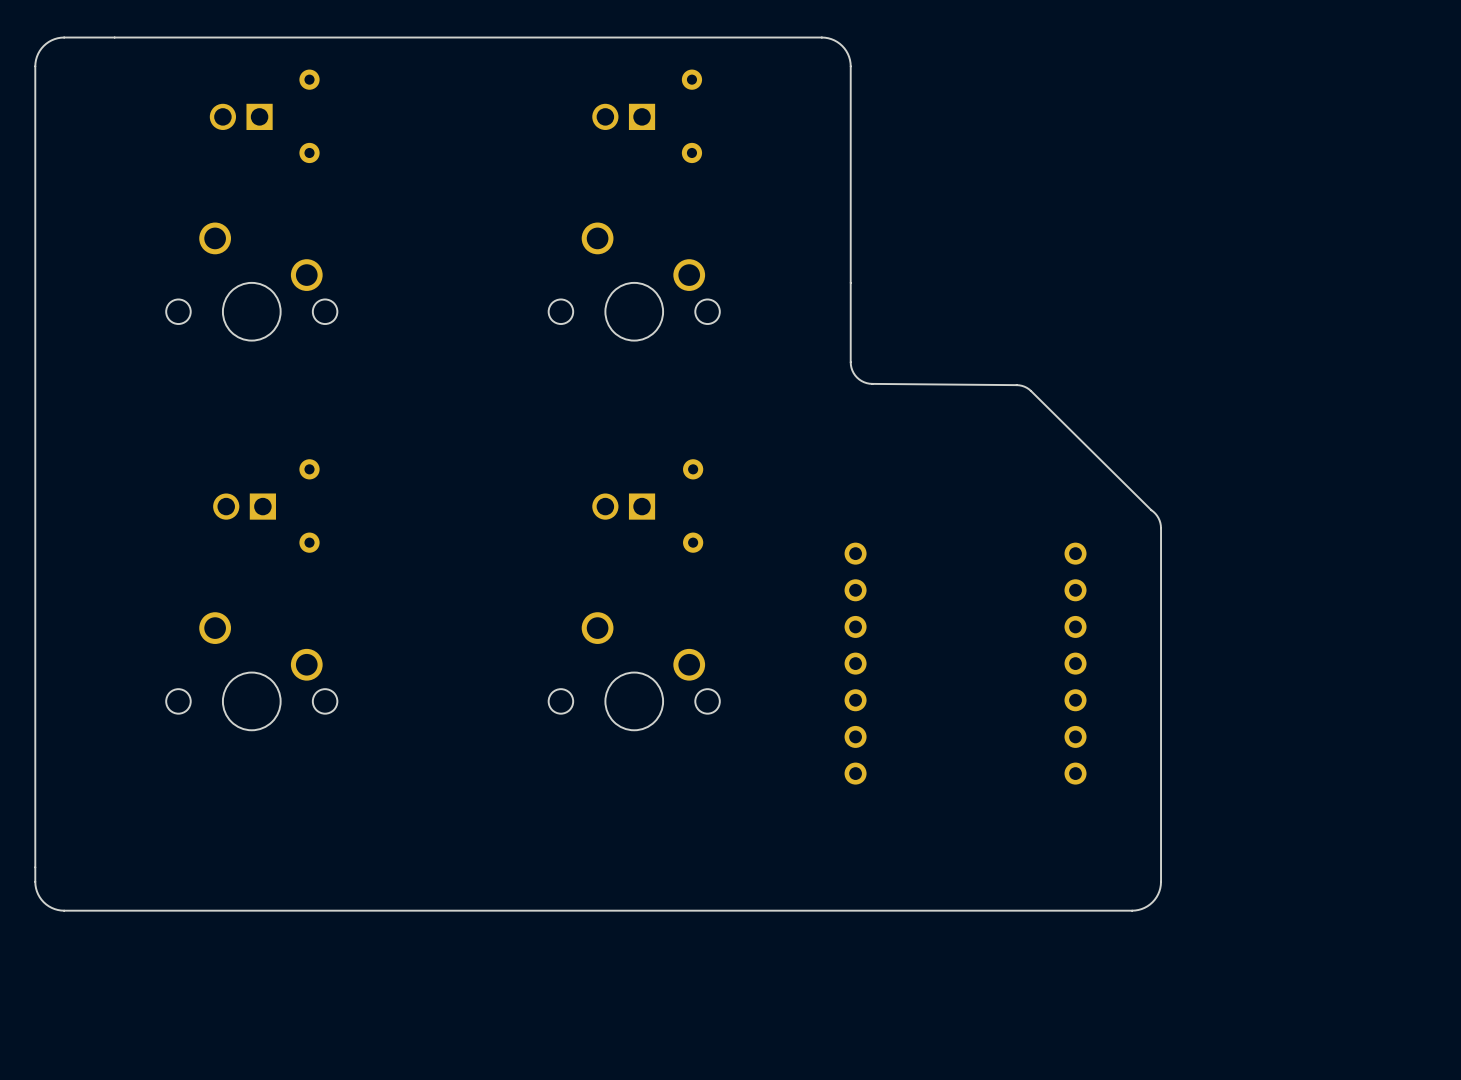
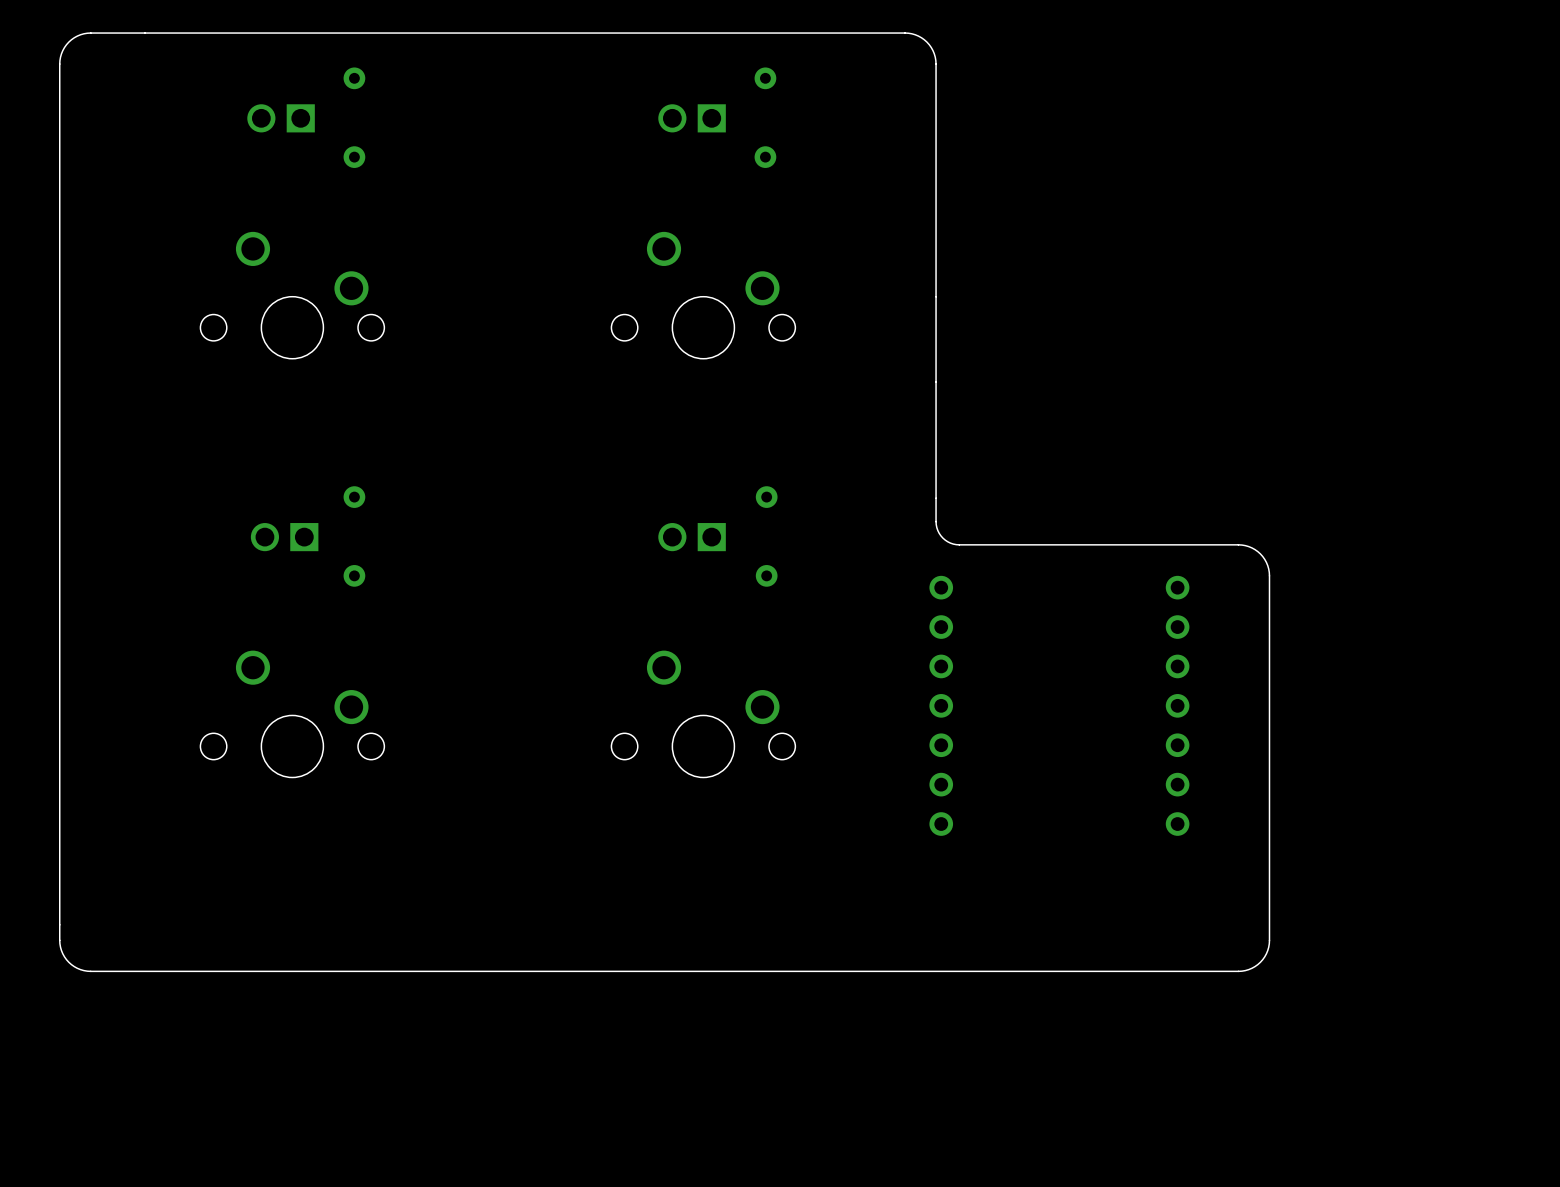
board edge: (850, 362) (852, 370) (857, 377) (869, 383) (1016, 385) (1026, 387) (1155, 513) (1160, 522) (1161, 542) -> (936, 382) (936, 524) (939, 533) (947, 541) (959, 544) (1241, 545) (1251, 547) (1262, 556) (1267, 565) (1269, 575)

